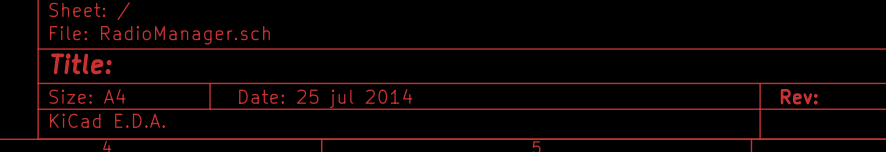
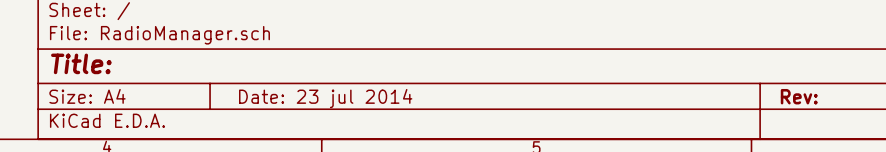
title block: Date: 25 jul 2014 (325, 98) -> Date: 23 jul 2014 (325, 98)

